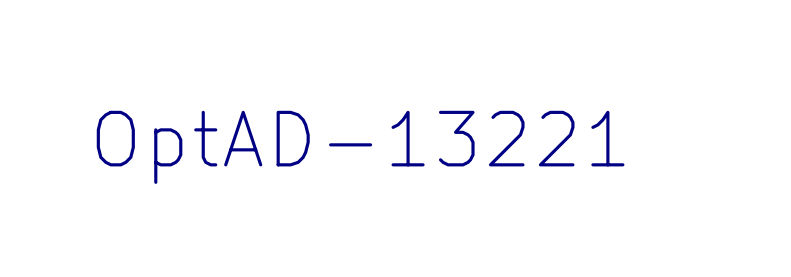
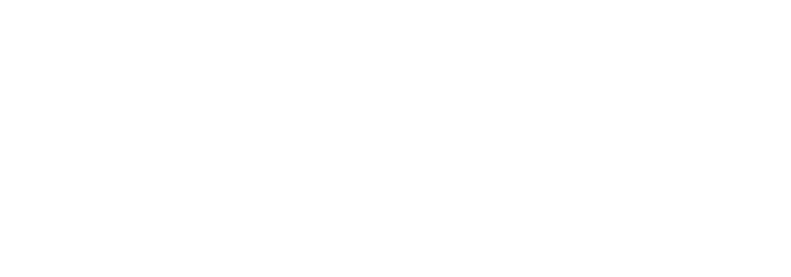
text: OptAD-13221 (360, 147) -> none

